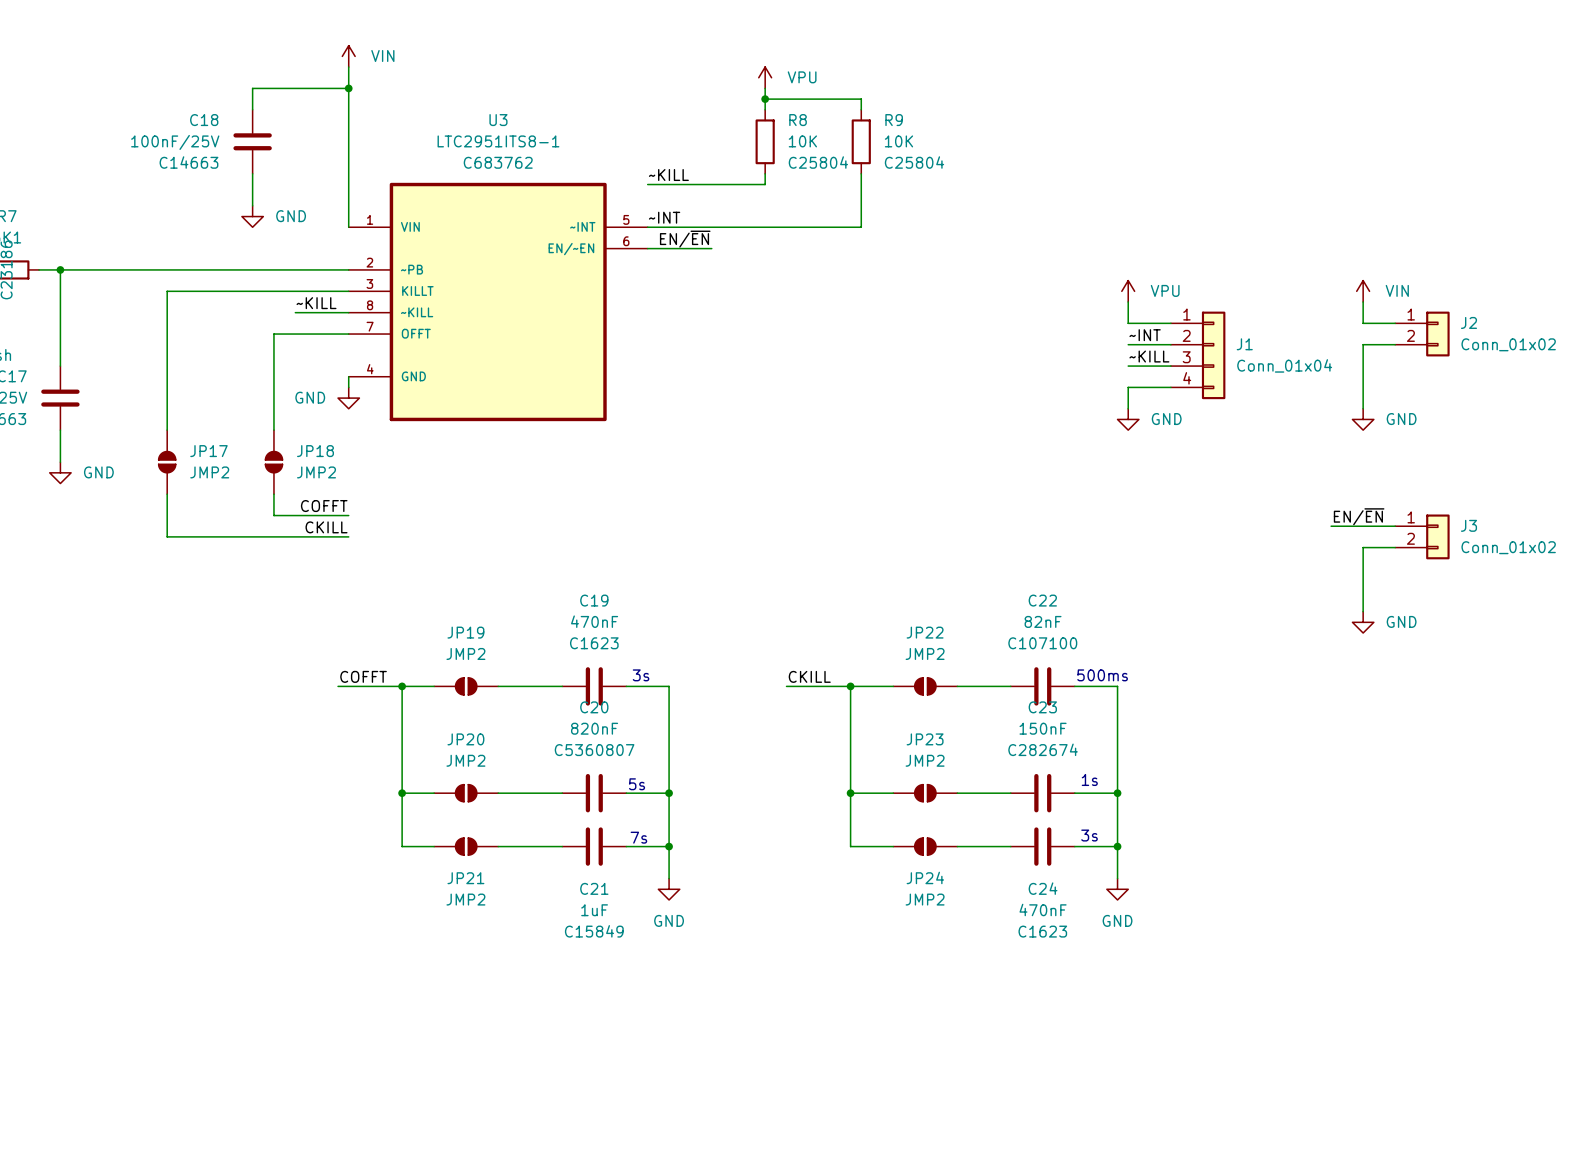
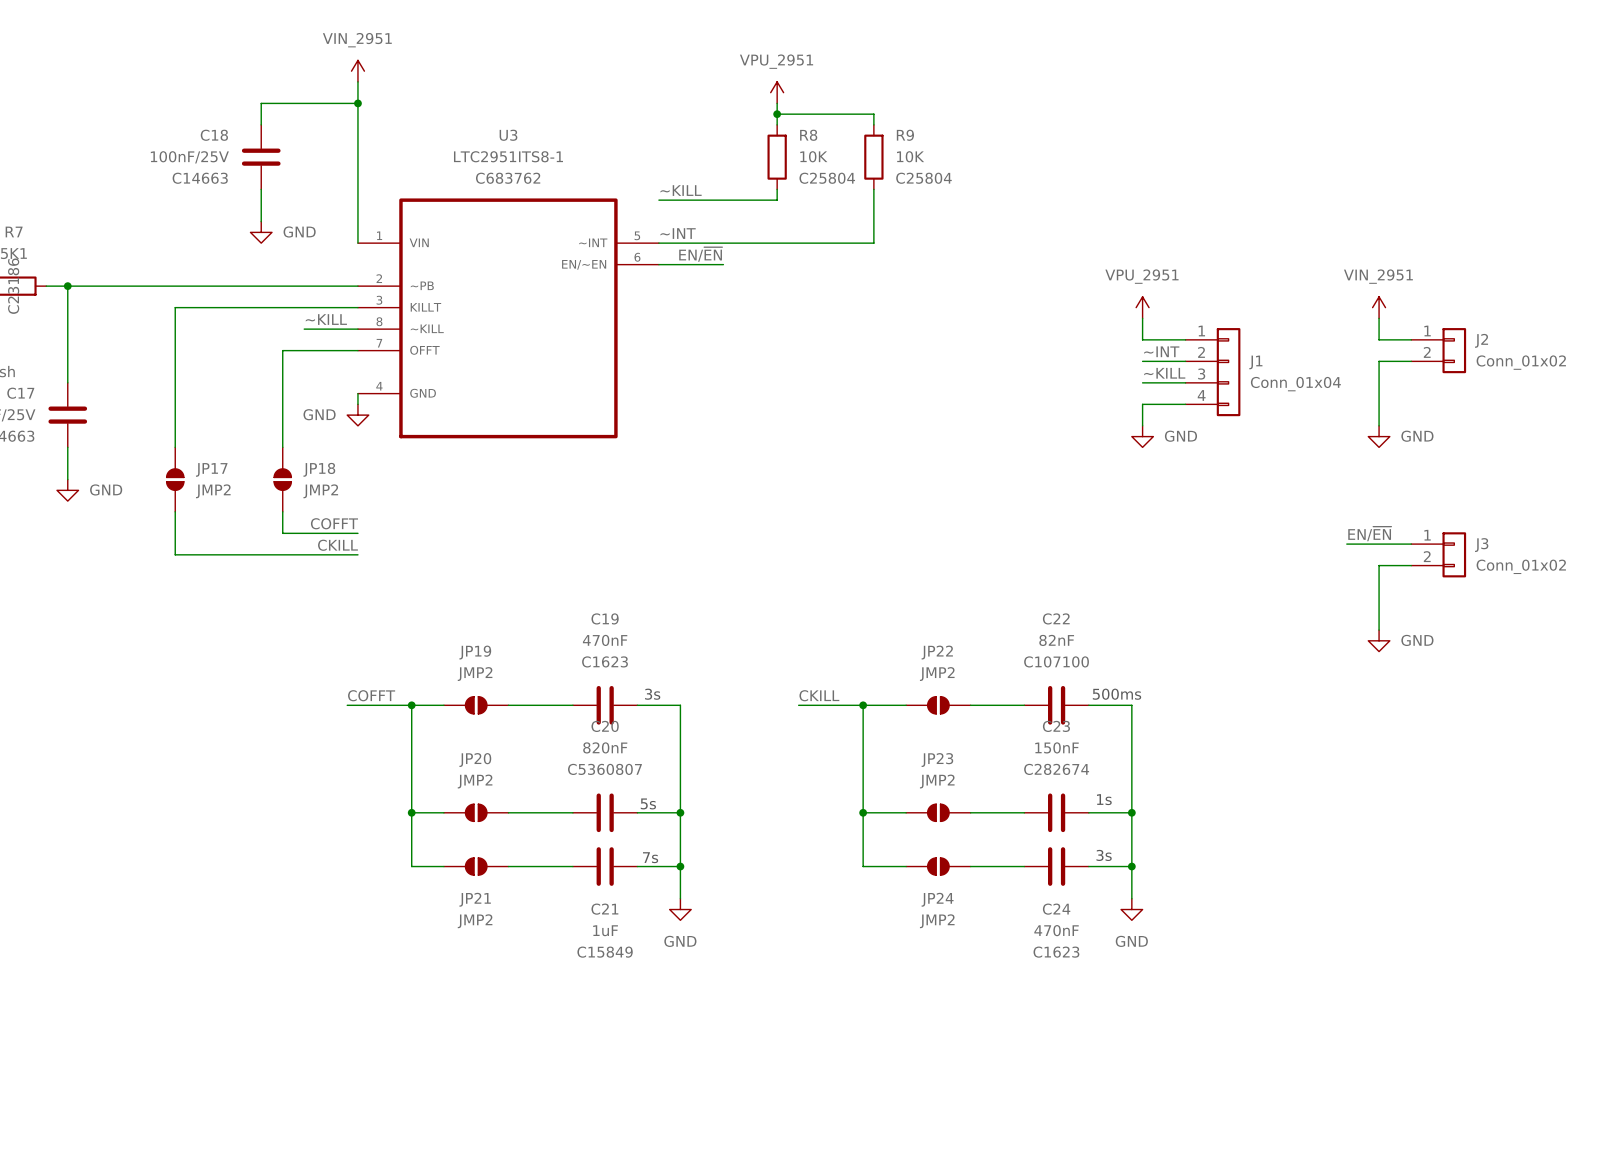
power symbol: VIN (348, 56) -> VIN_2951 (357, 71)
power symbol: VPU (765, 77) -> VPU_2951 (777, 92)
power symbol: VPU (1128, 291) -> VPU_2951 (1142, 307)
power symbol: VIN (1363, 291) -> VIN_2951 (1379, 307)

